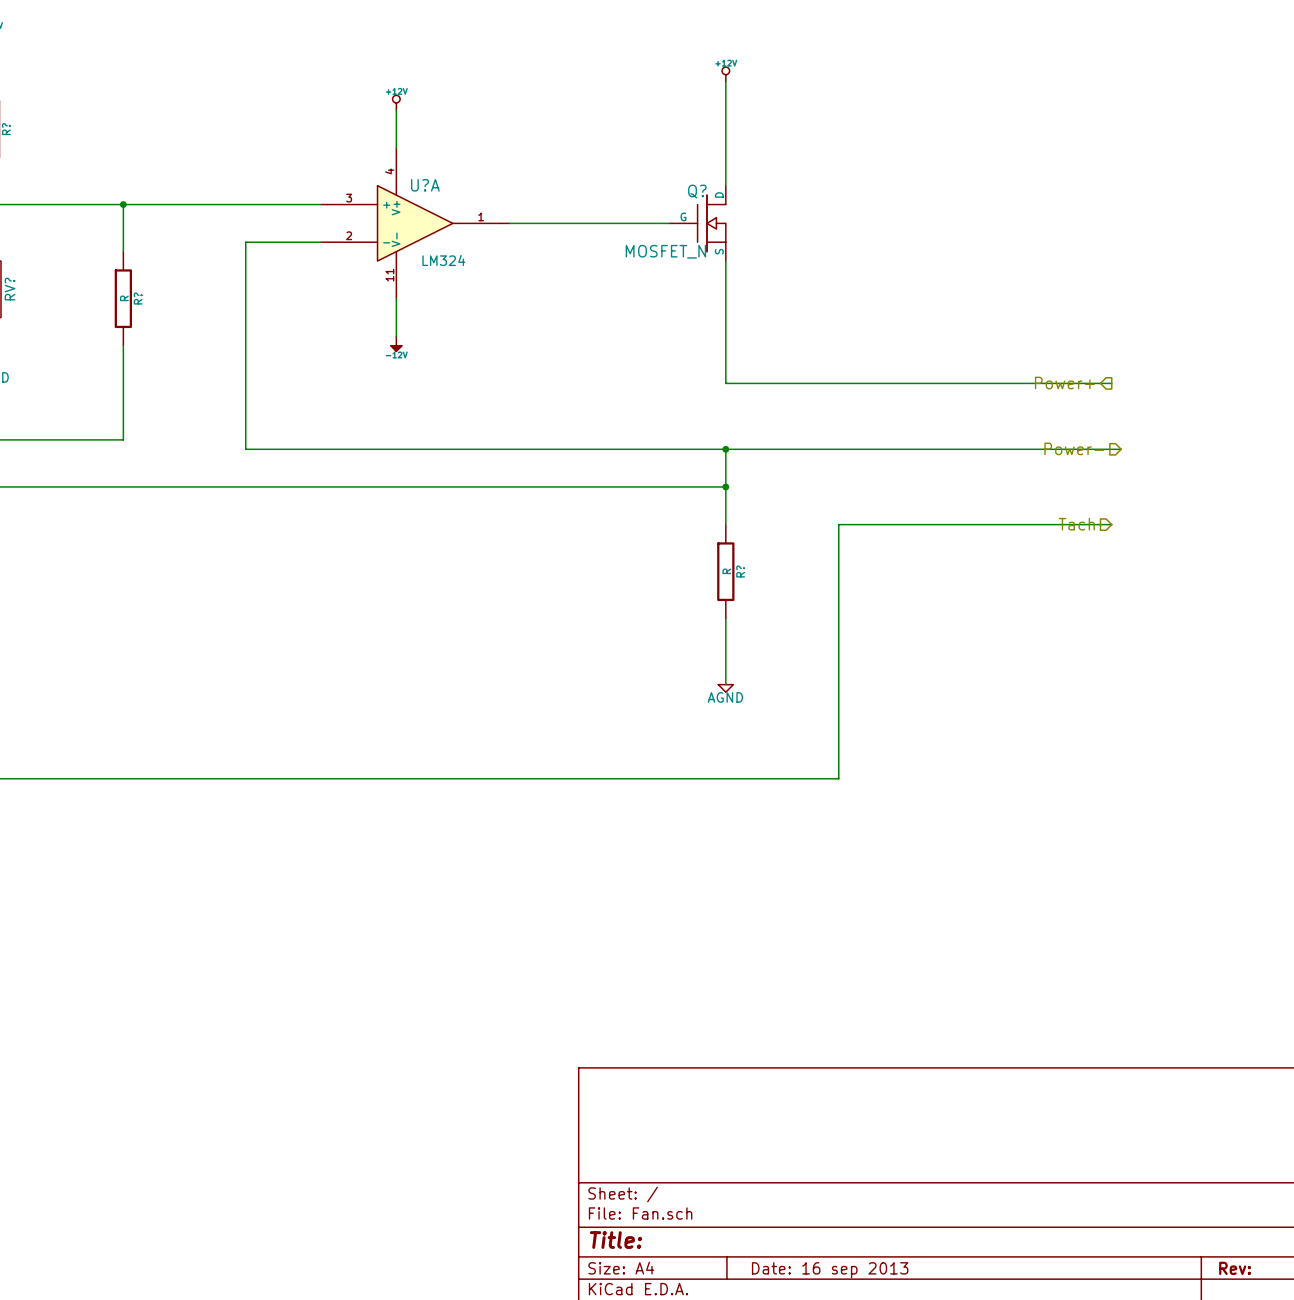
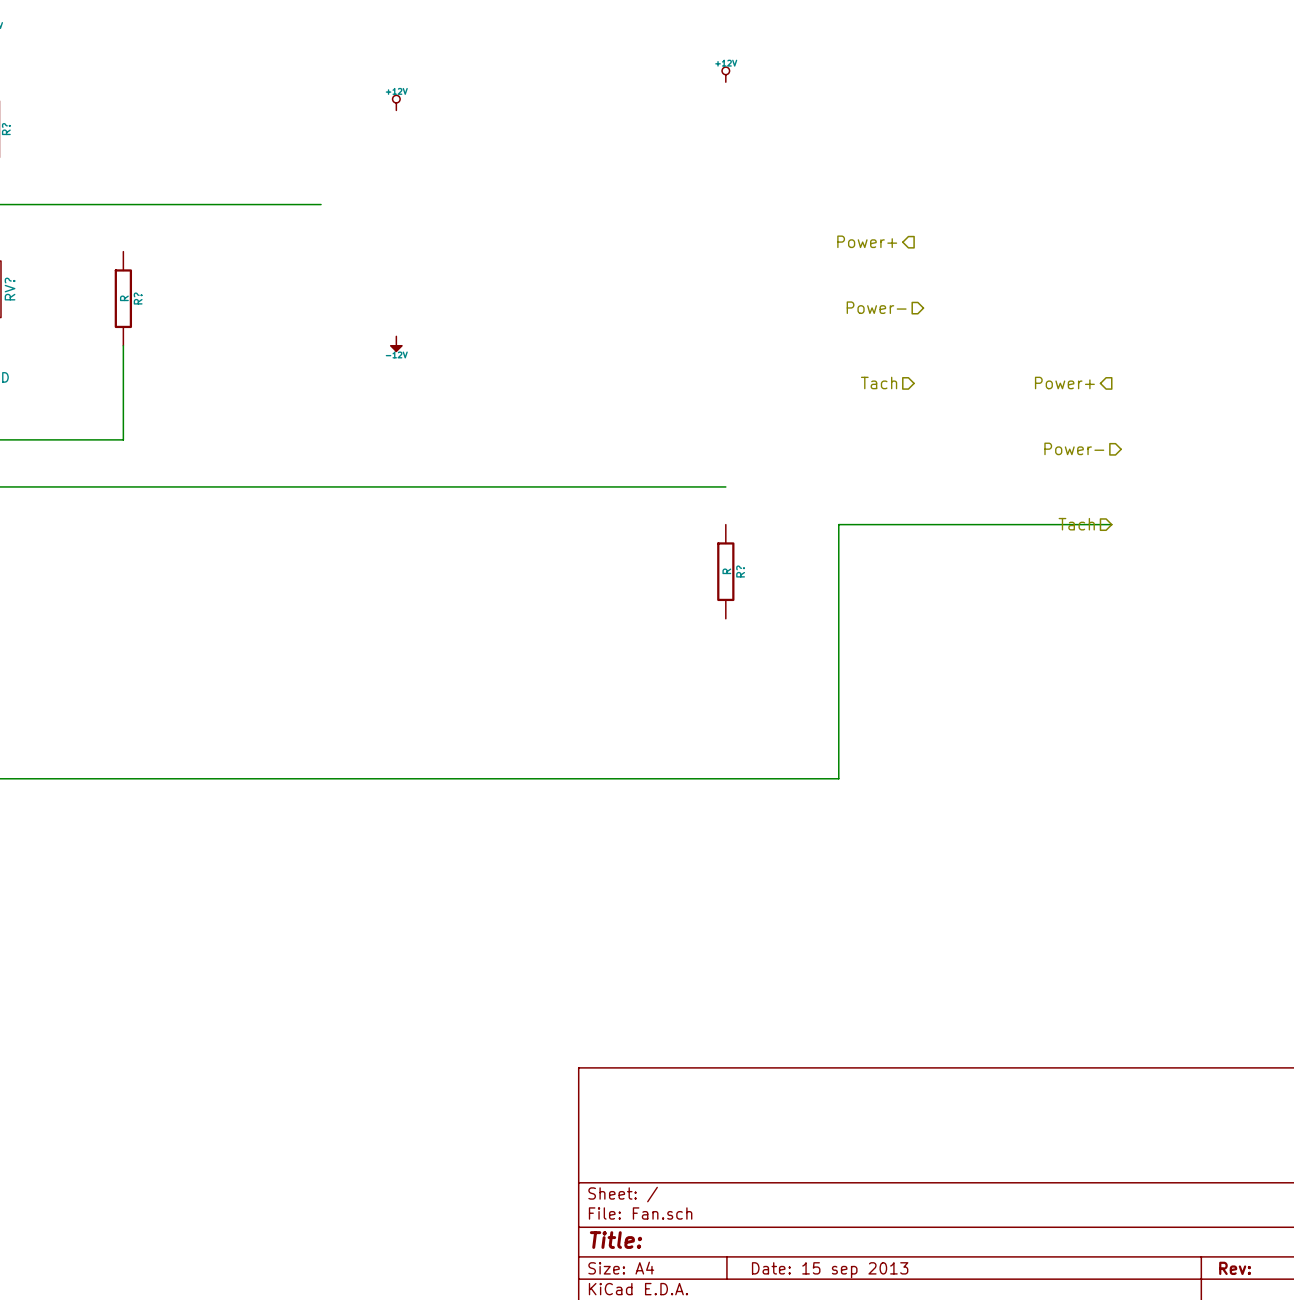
wire: (725, 82) (725, 185) -> none
wire: (396, 110) (396, 148) -> none
wire: (123, 204) (123, 251) -> none
junction: (123, 204) -> none
U?A: LM324 (415, 223) -> none
wire: (509, 223) (669, 223) -> none
Q?: MOSFET_N (697, 223) -> none
hierarchical label: none -> Power+ (867, 241)
wire: (321, 242) (245, 242) (245, 449) (1121, 449) -> none
wire: (725, 261) (725, 383) (1111, 383) -> none
wire: (396, 298) (396, 336) -> none
hierarchical label: none -> Power- (876, 307)
hierarchical label: none -> Tach (879, 382)
wire: (725, 449) (725, 524) -> none
junction: (725, 449) -> none
junction: (725, 486) -> none
wire: (725, 618) (725, 684) -> none
power symbol: AGND (725, 688) -> none
title block: Date: 16 sep 2013 (830, 1270) -> Date: 15 sep 2013 (830, 1270)

